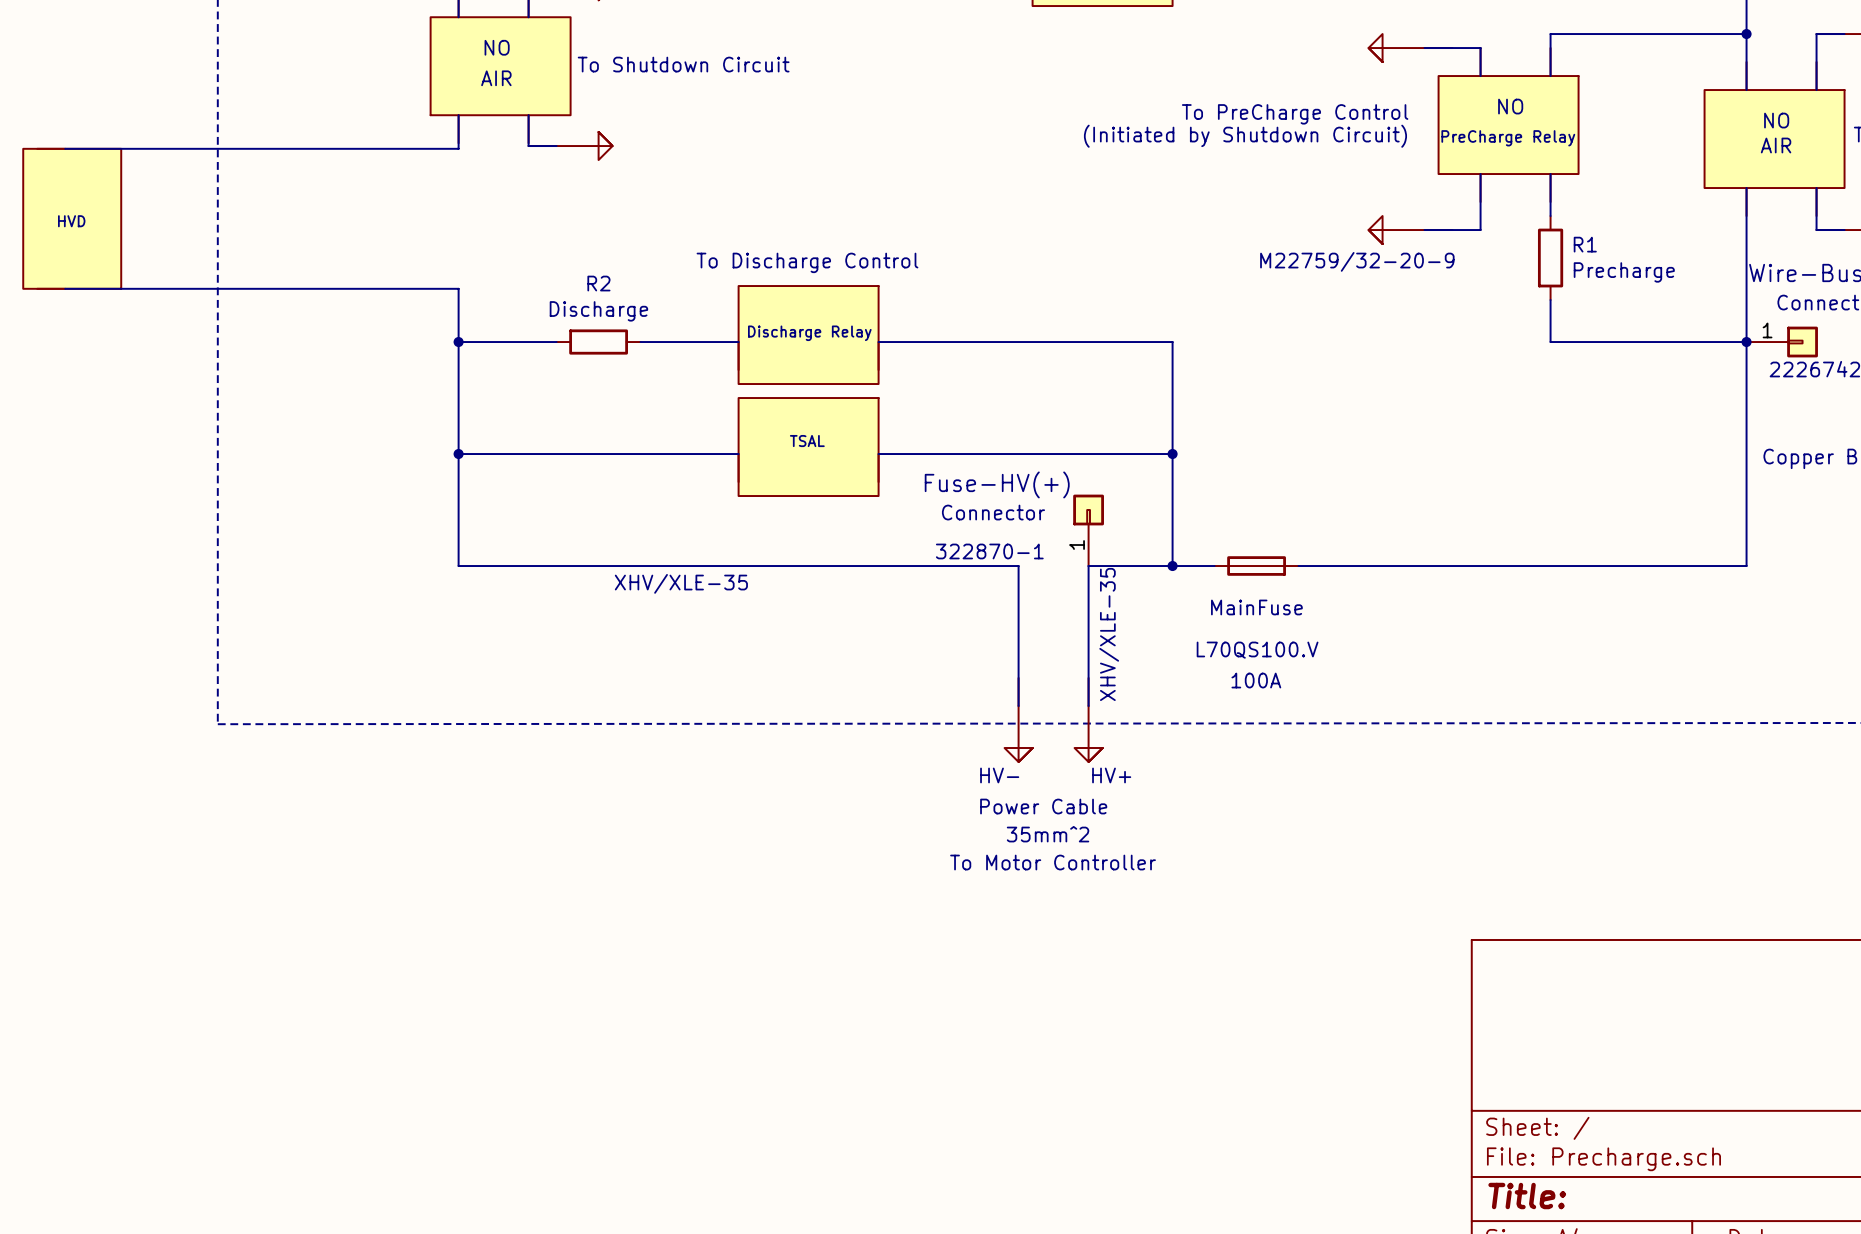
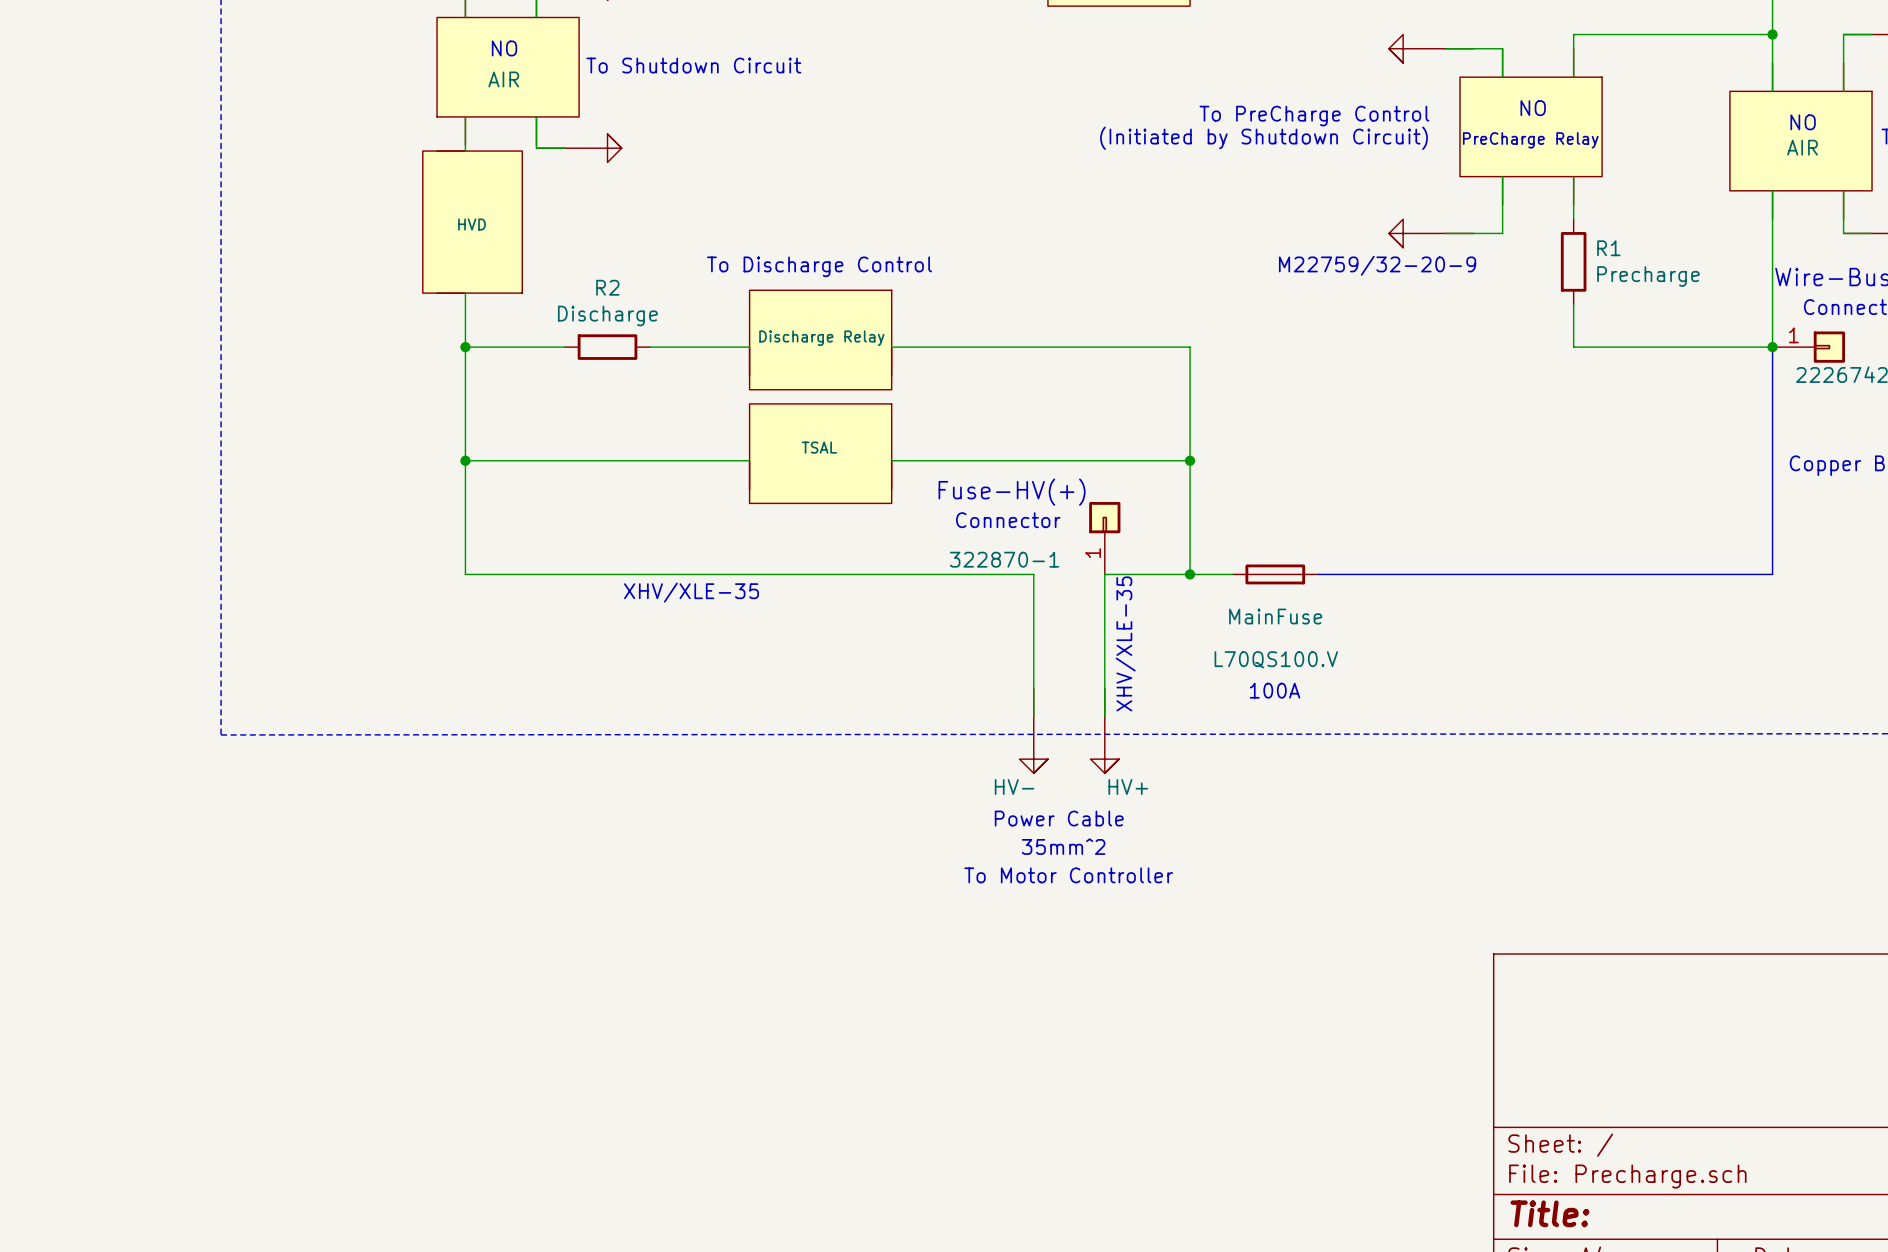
wire: (65, 148) (458, 148) -> none
part: HVD (72, 218) -> none
part: none -> HVD (472, 222)
wire: (65, 288) (458, 288) -> none

